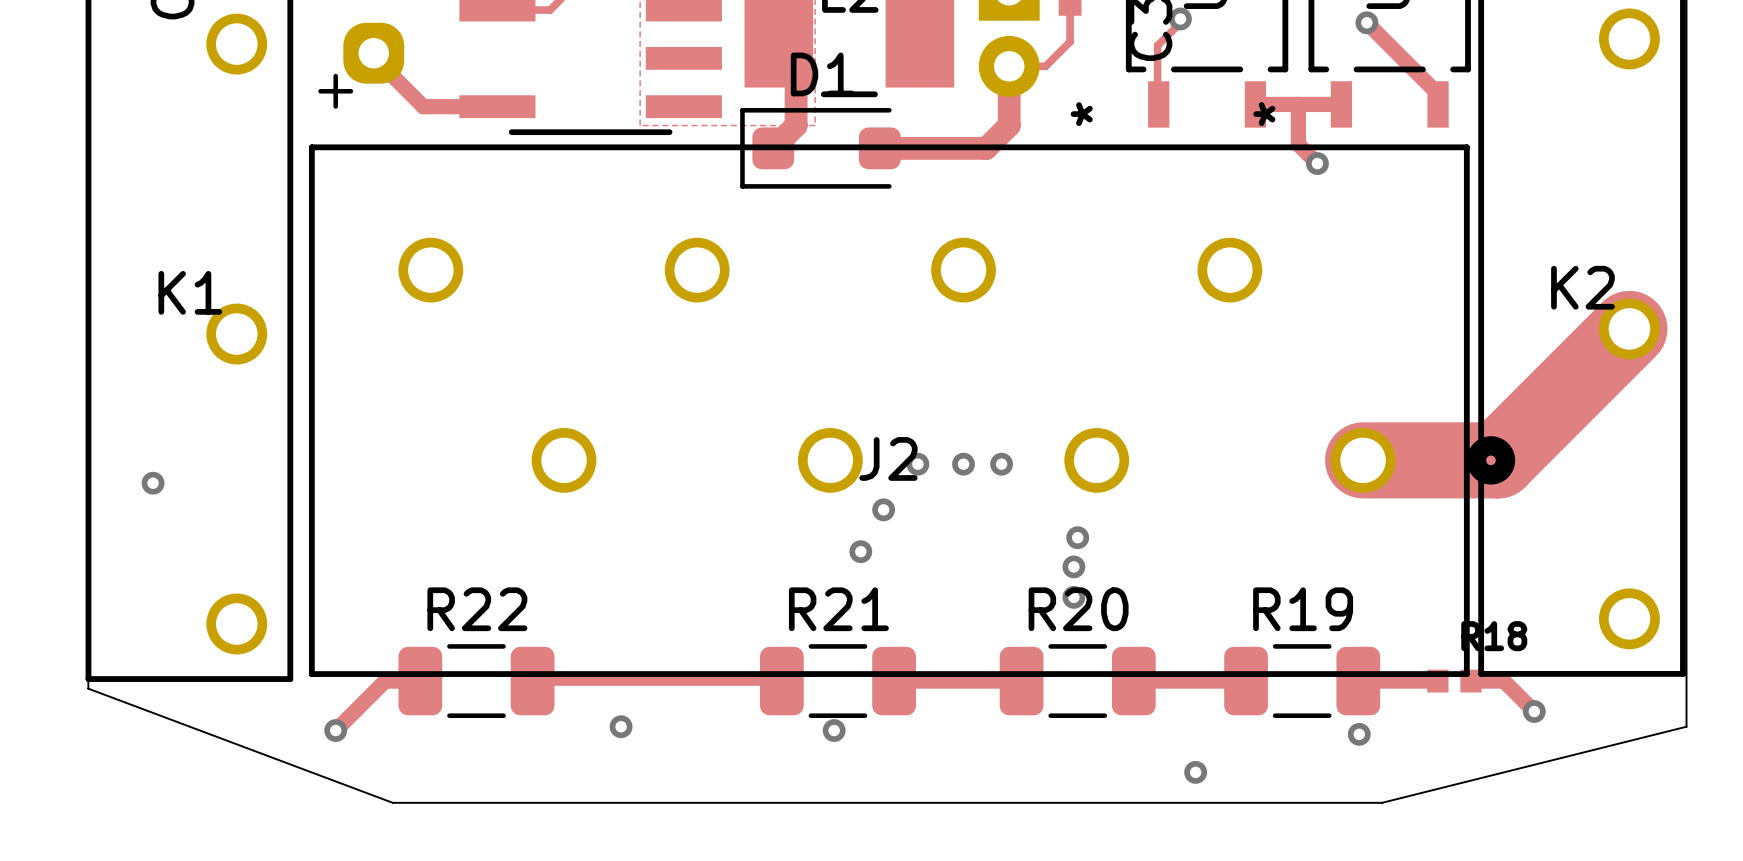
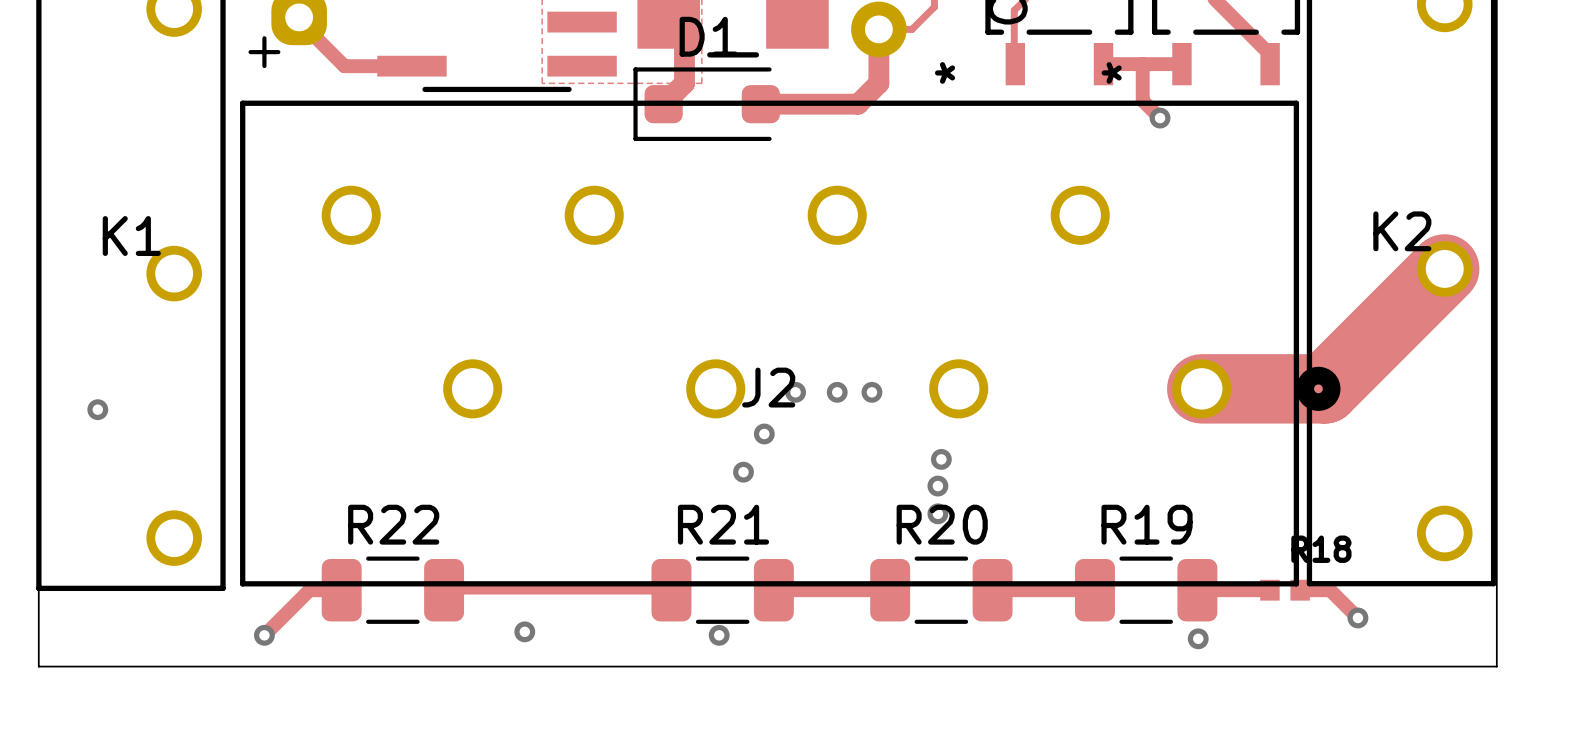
board edge: (88, 688) (392, 802) (1382, 802) (1686, 726) -> (38, 597) (38, 666) (1496, 666) (1496, 631)
via: (1195, 772) -> none

